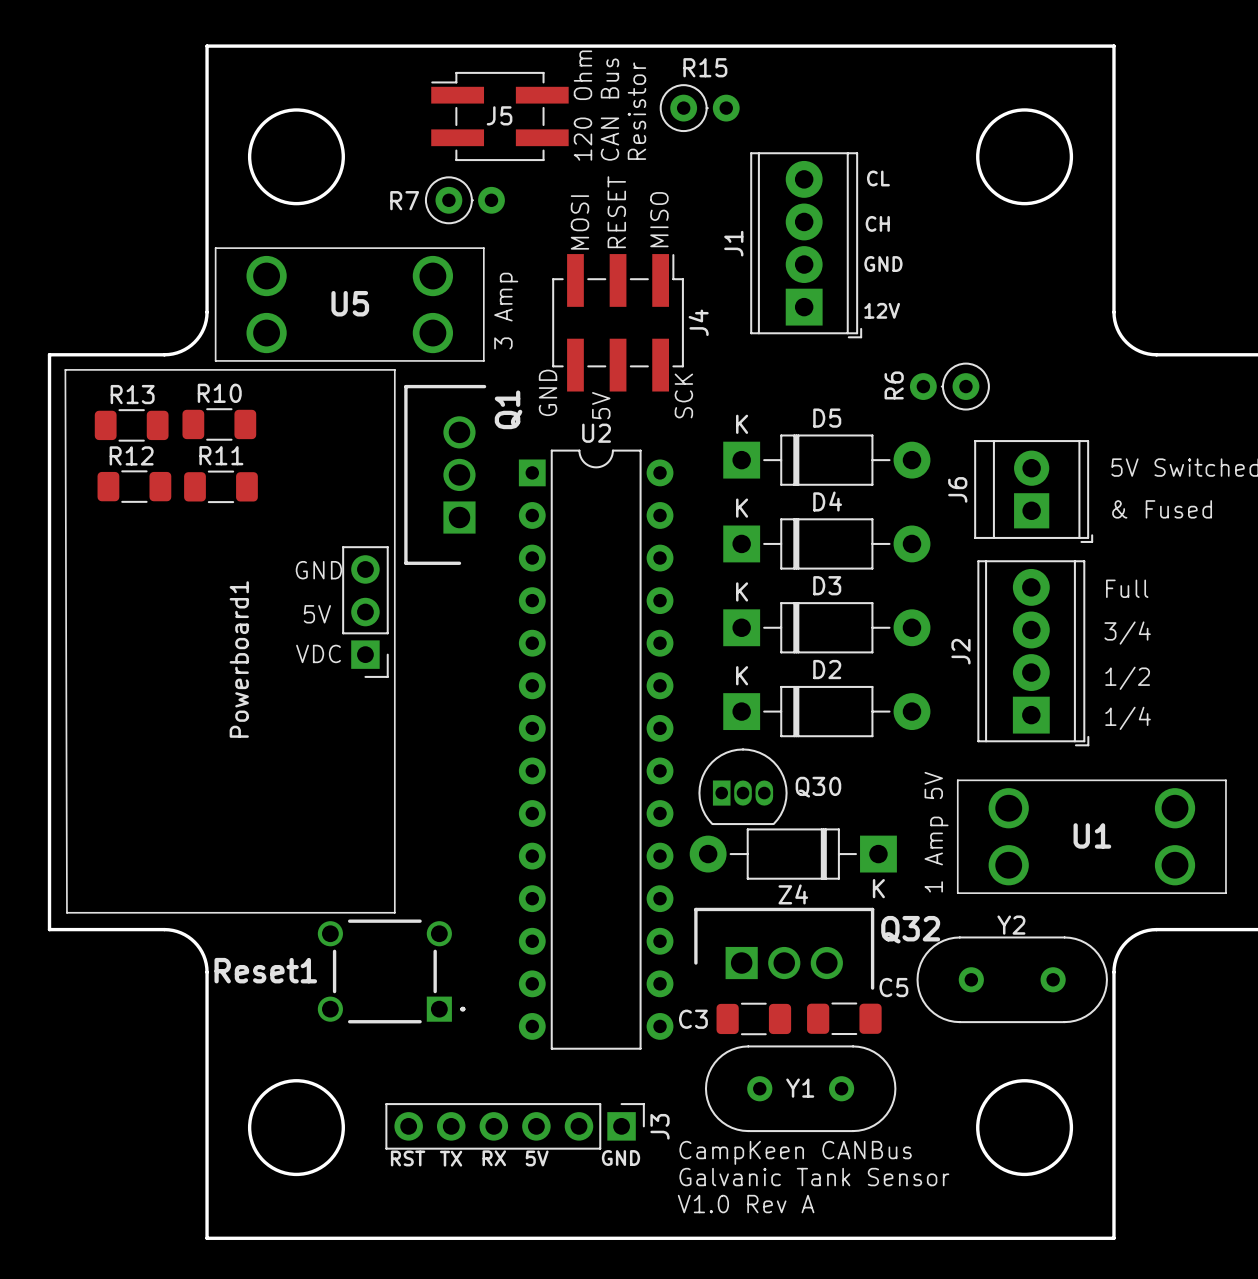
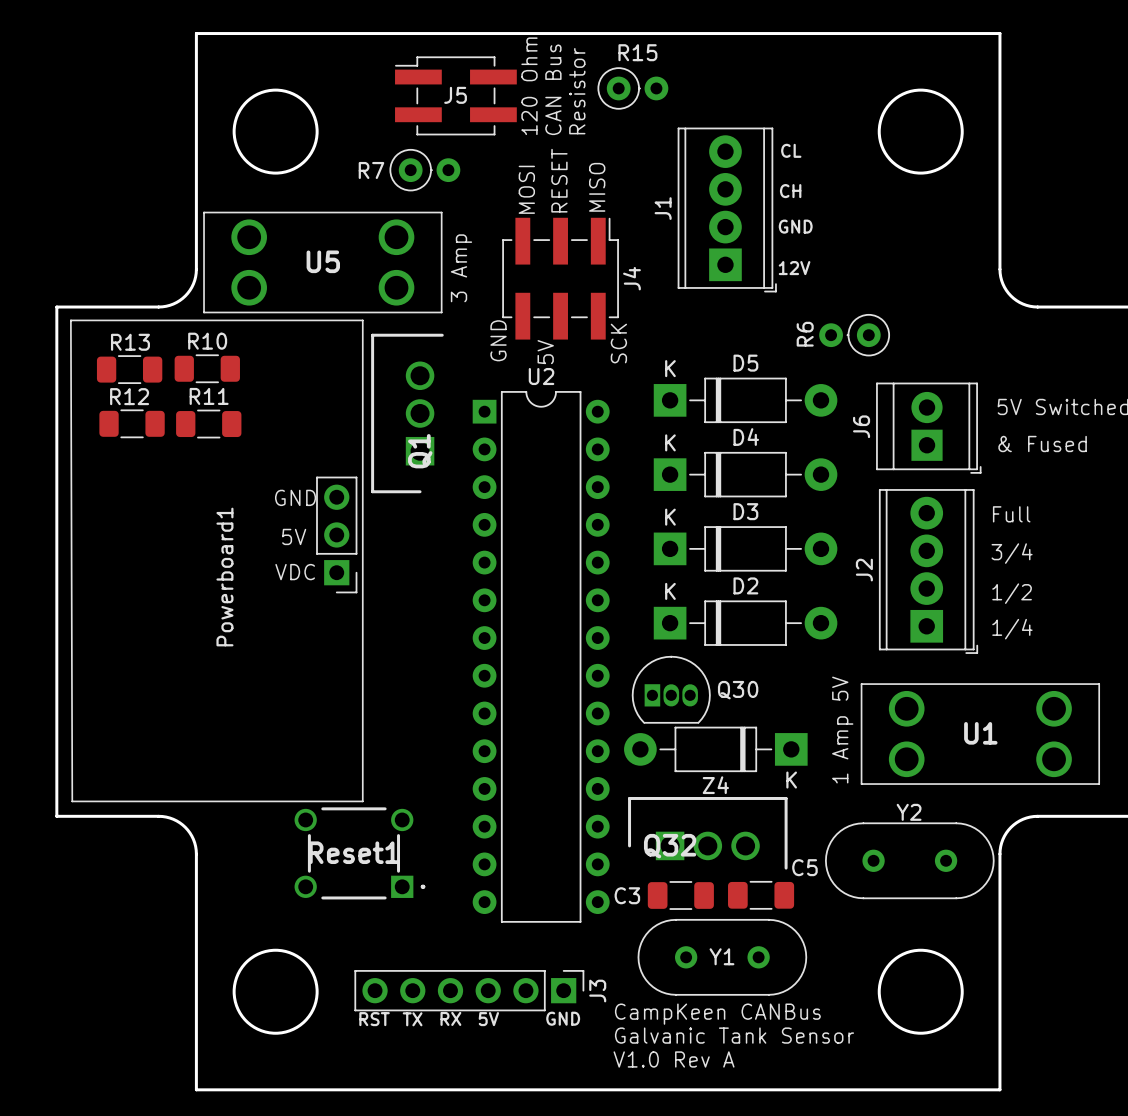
Q1 name position: Q1 (508, 409) -> Q1 (420, 451)
Q32 name position: Q32 (910, 929) -> Q32 (670, 846)
Reset1 name position: Reset1 (265, 970) -> Reset1 (354, 852)

